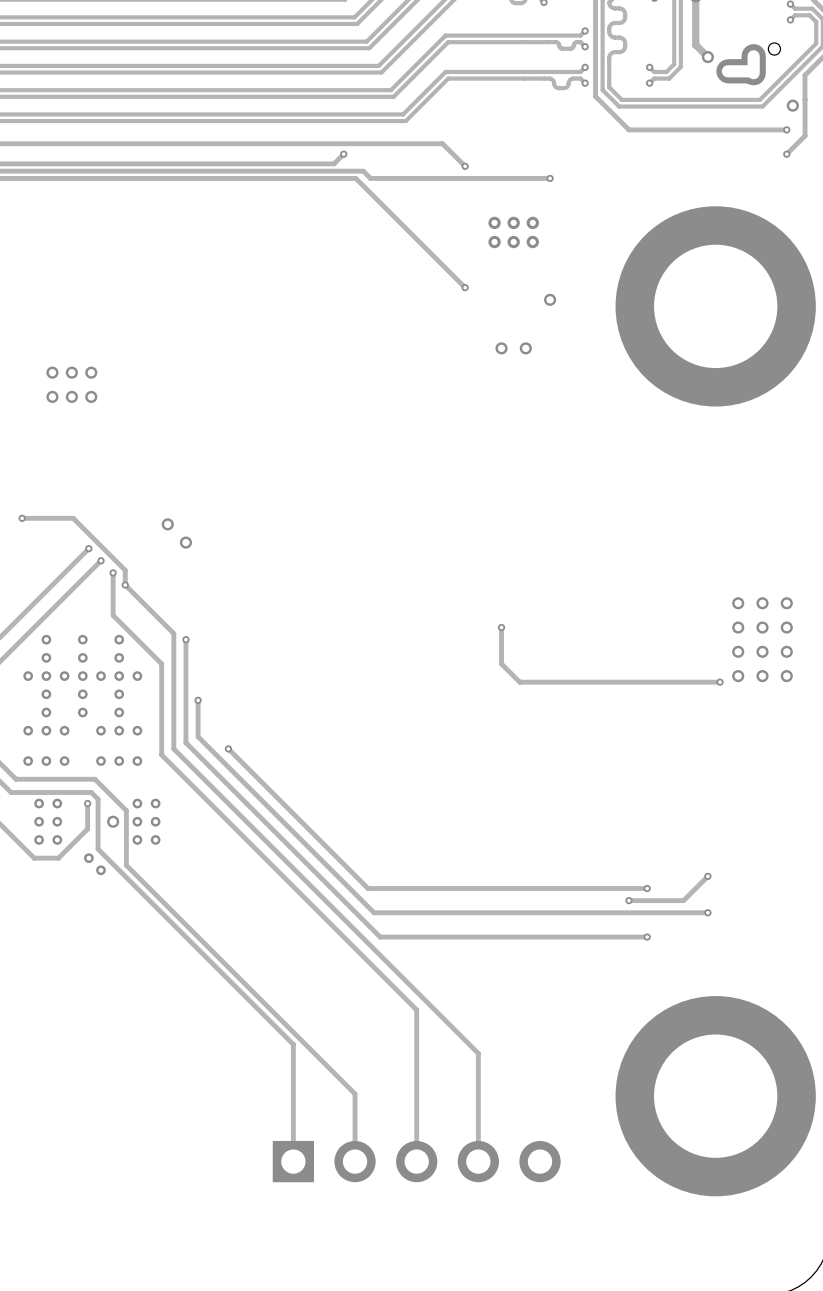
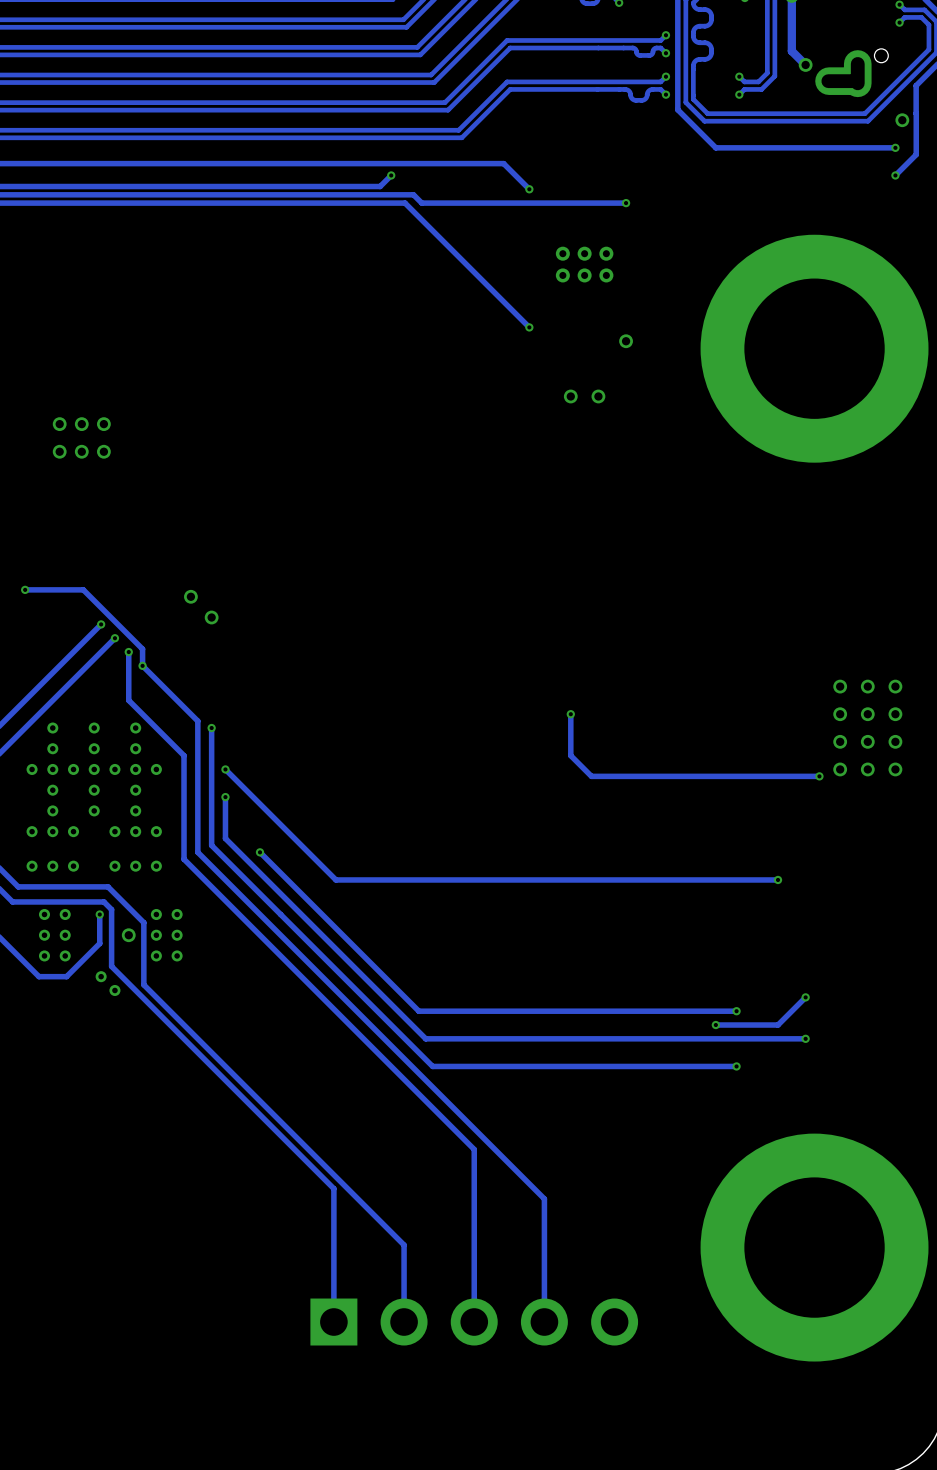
track: none -> (225, 769) (335, 879) (778, 879)
via: none -> (225, 769)
via: none -> (778, 879)

